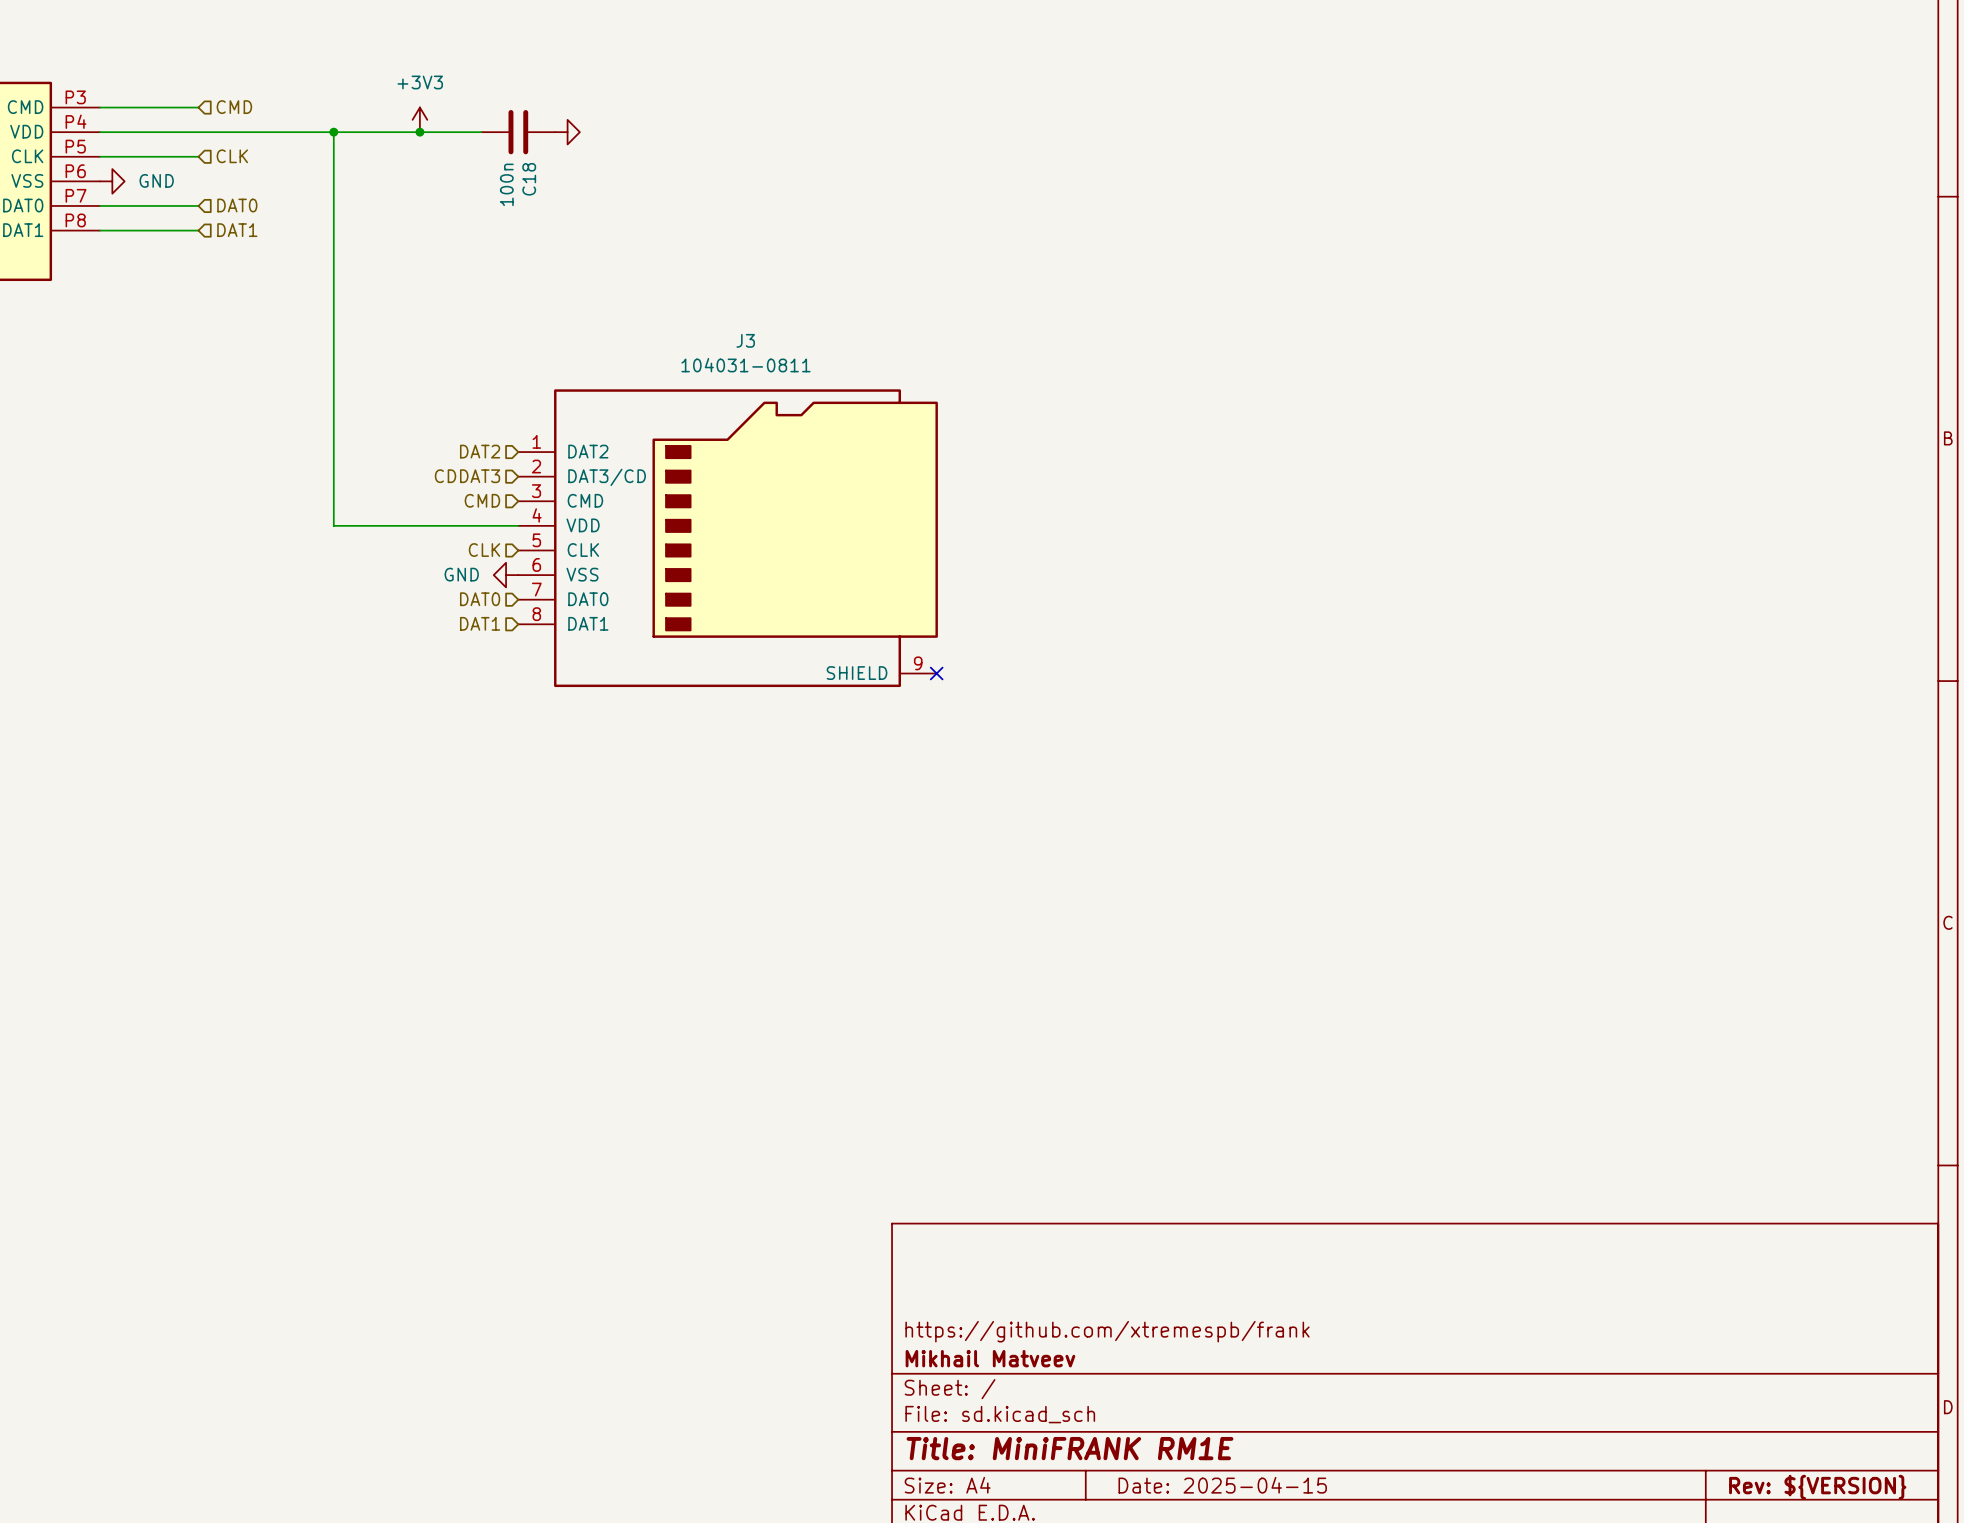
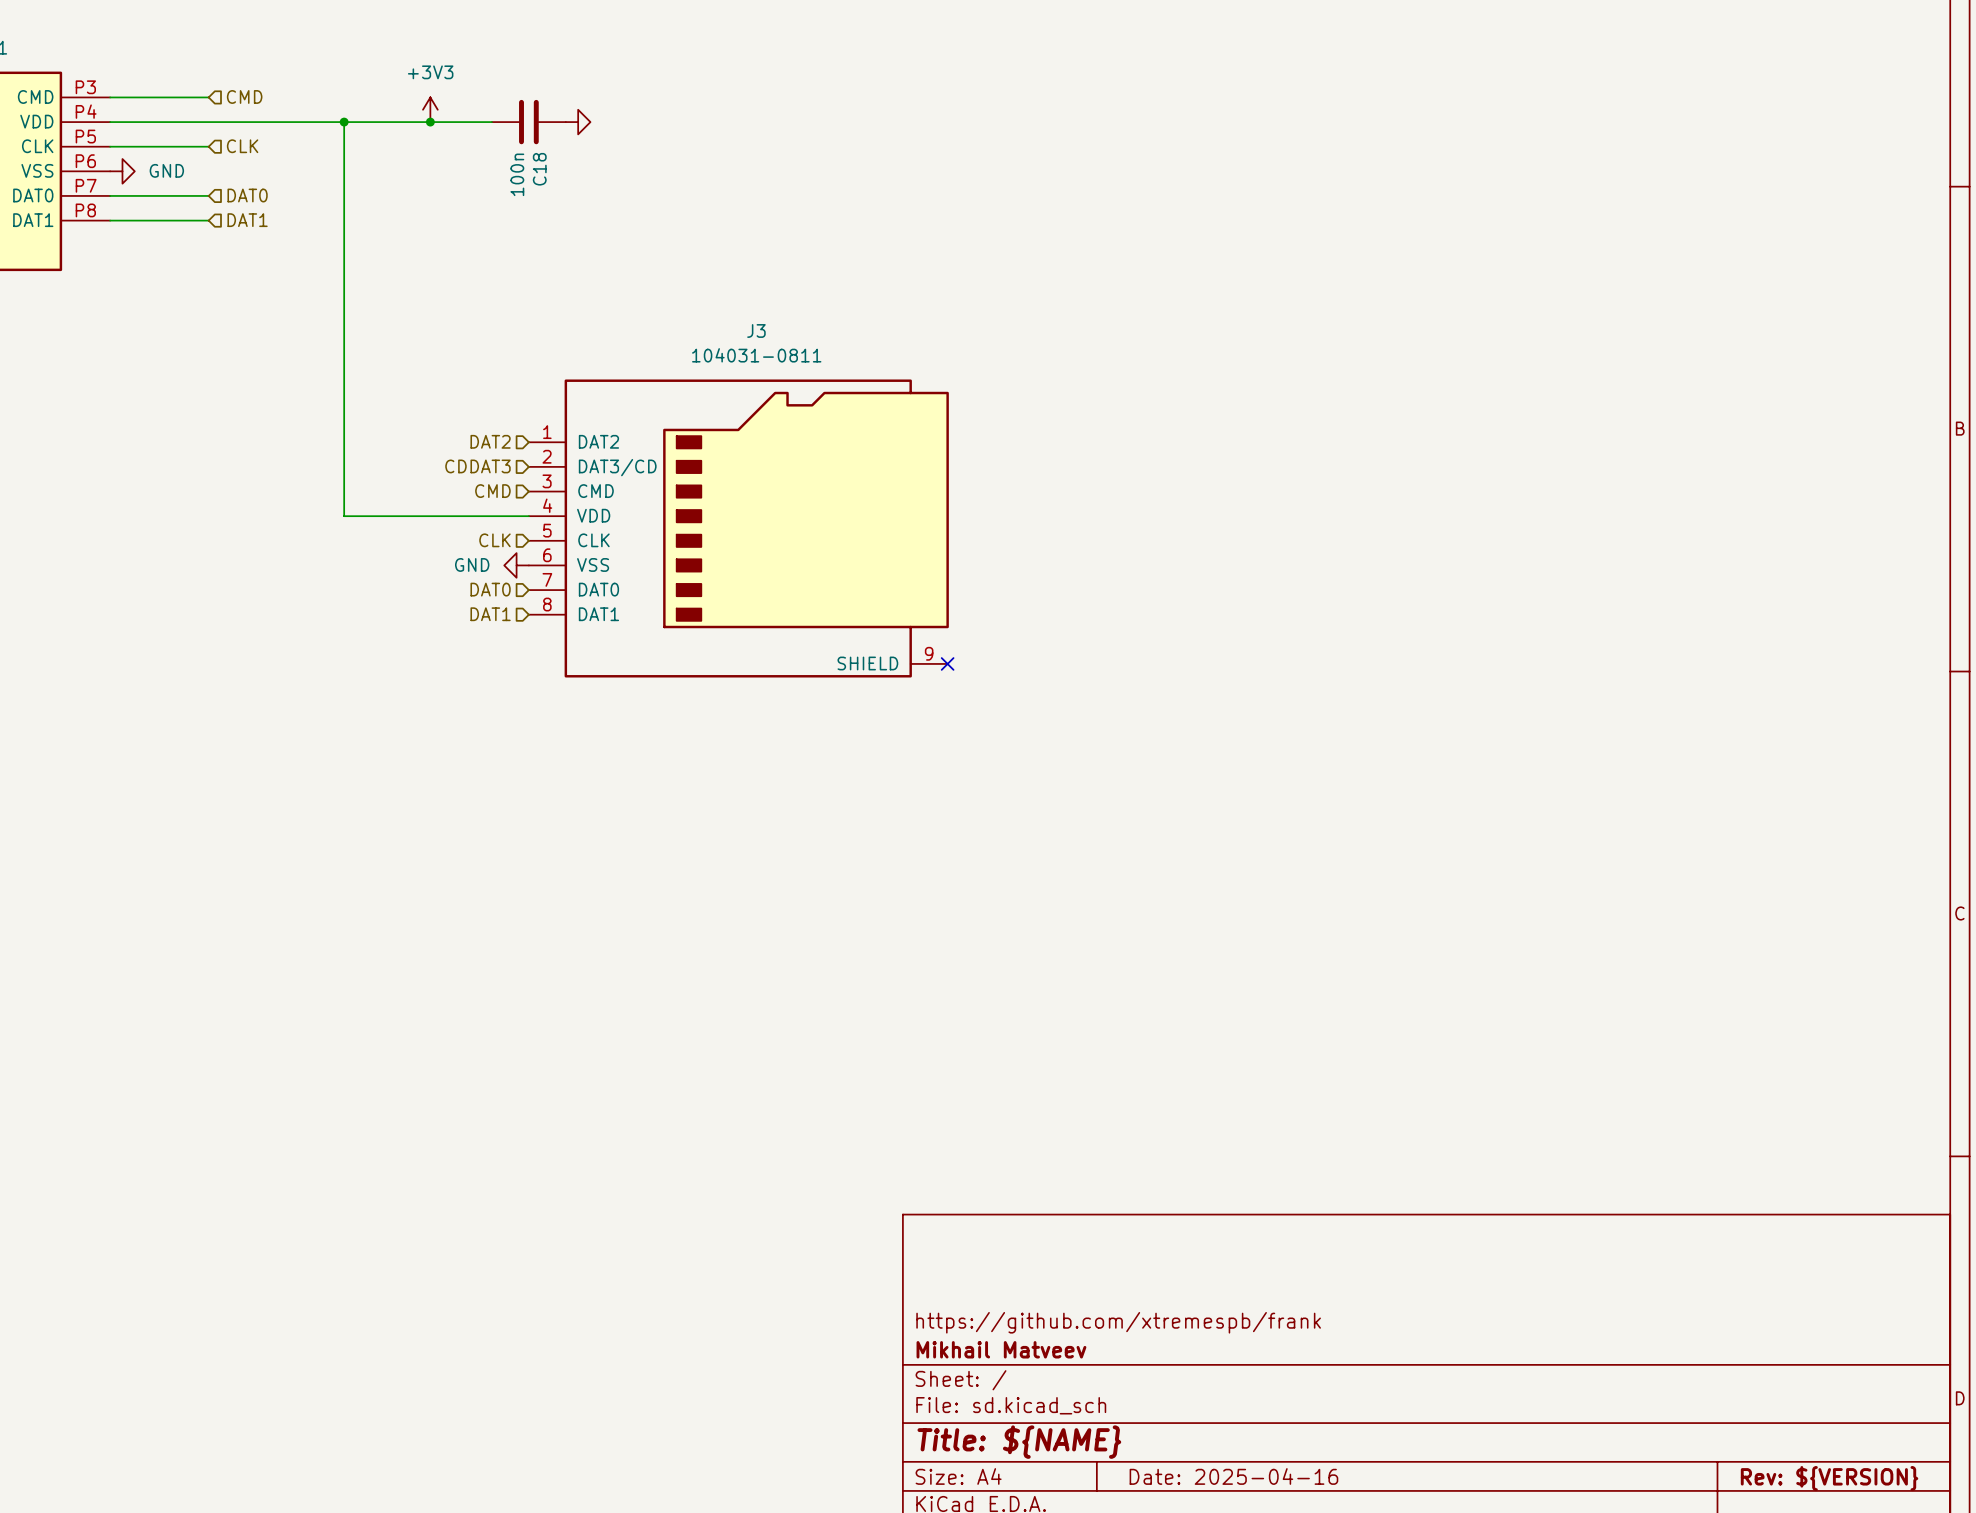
title block: Title: MiniFRANK RM1E (1069, 1448) -> Title: ${NAME} (1019, 1442)
title block: Date: 2025-04-15 (1222, 1485) -> Date: 2025-04-16 (1233, 1476)

